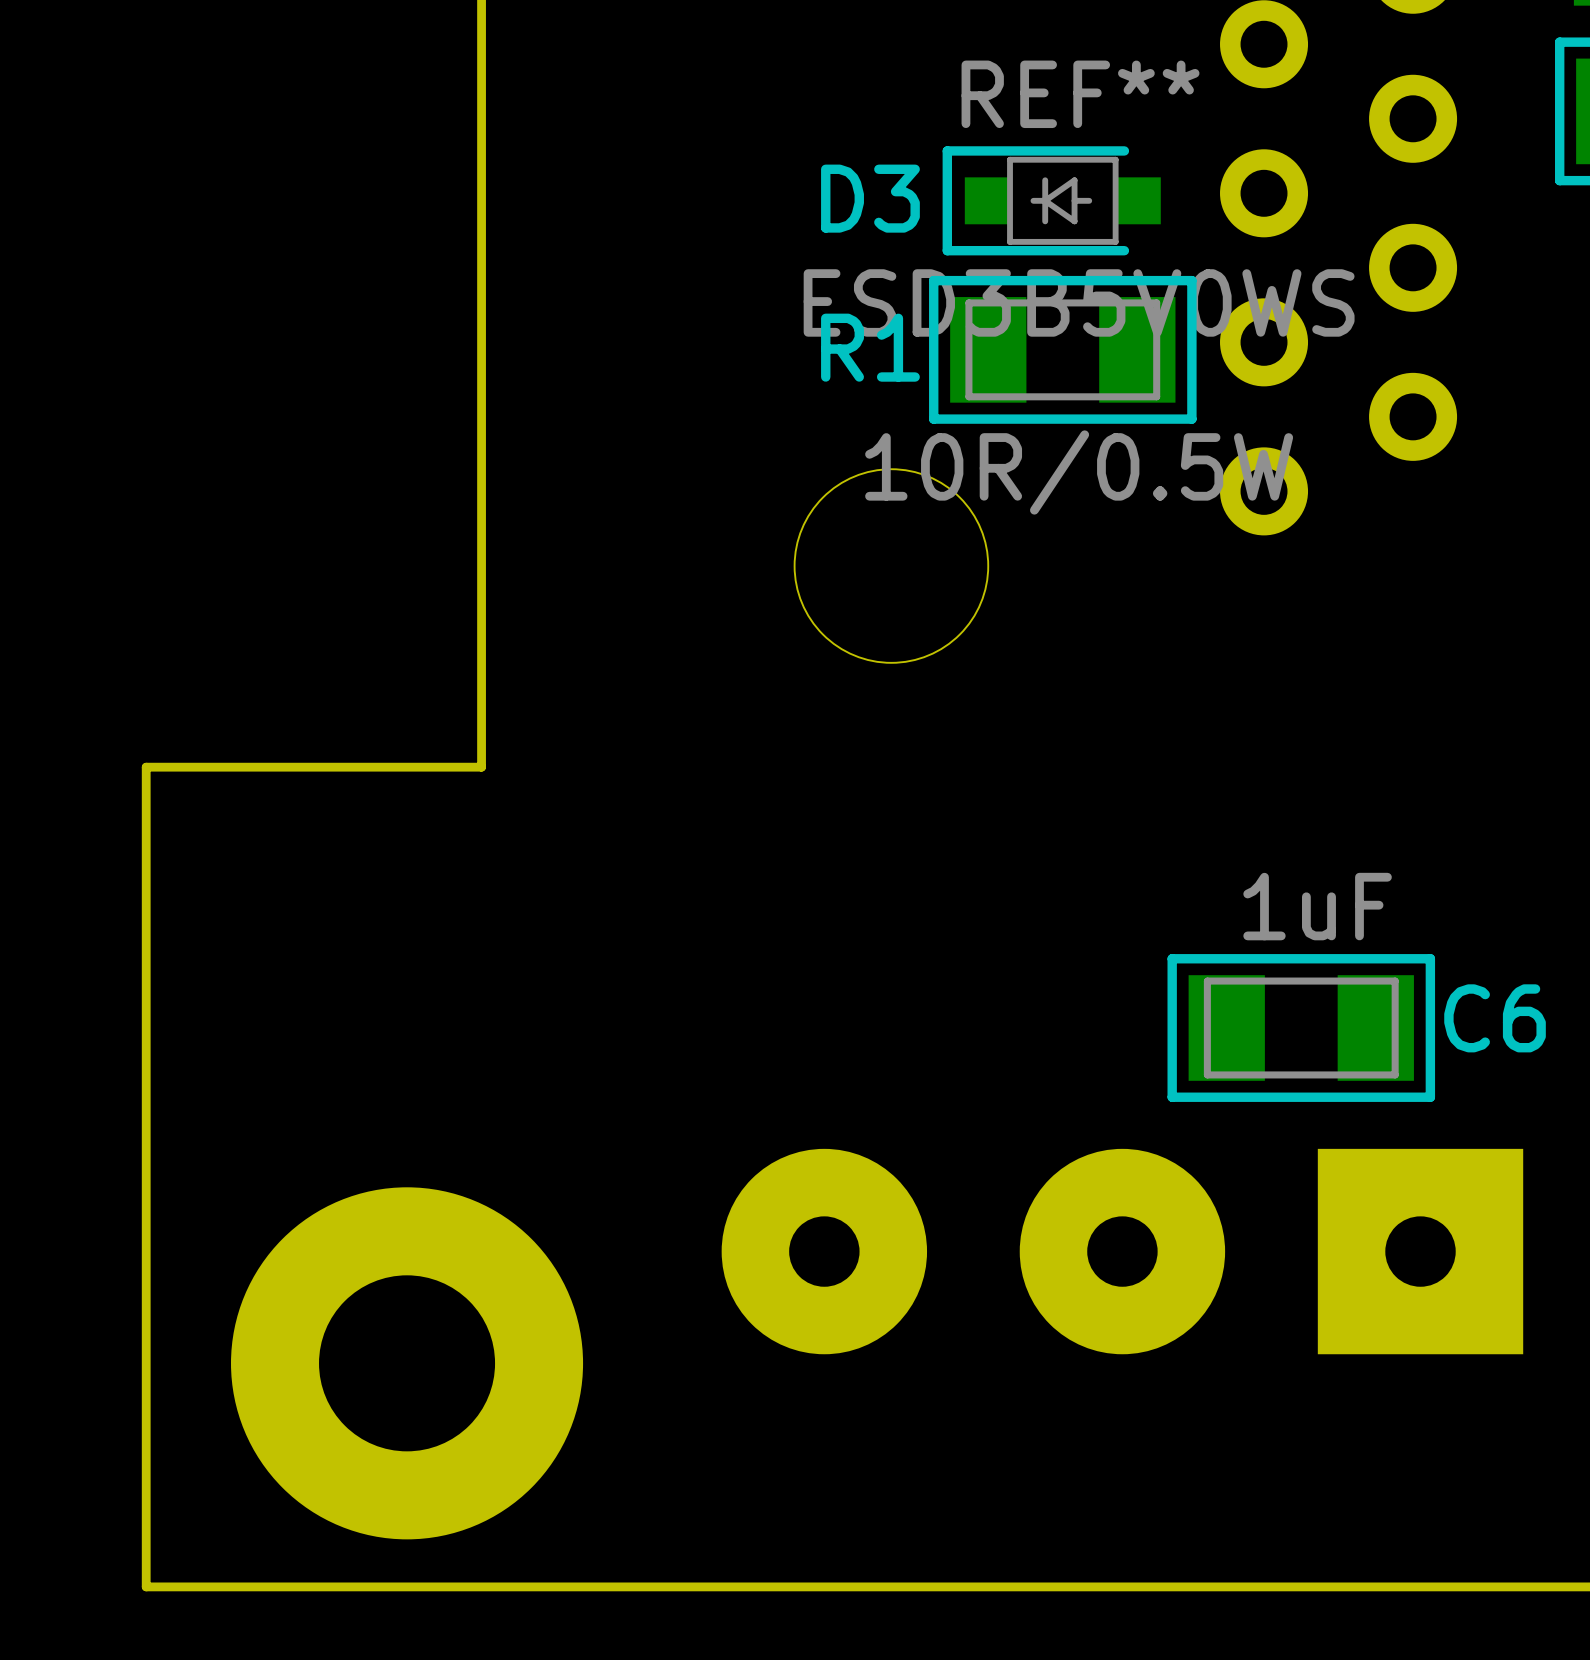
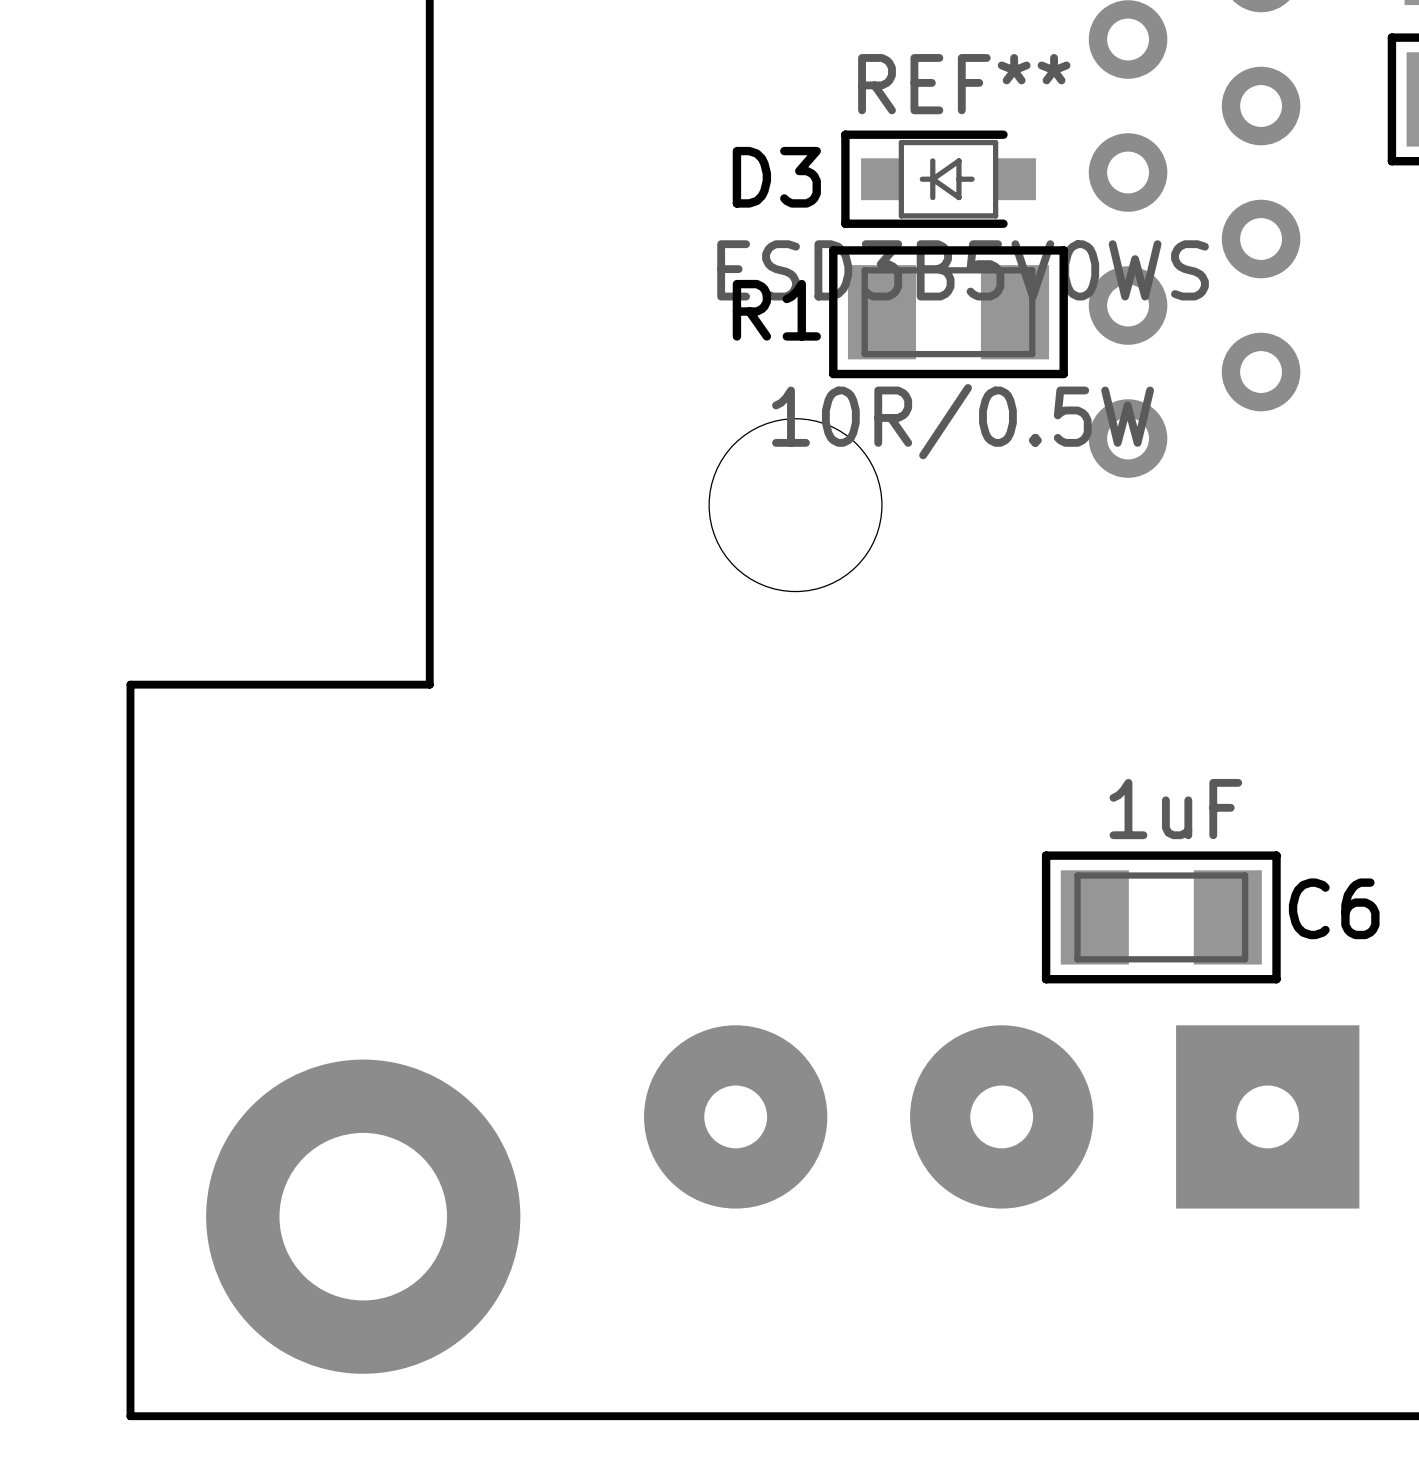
part footprint: [231, 1187, 584, 1540] -> [206, 1059, 521, 1374]

